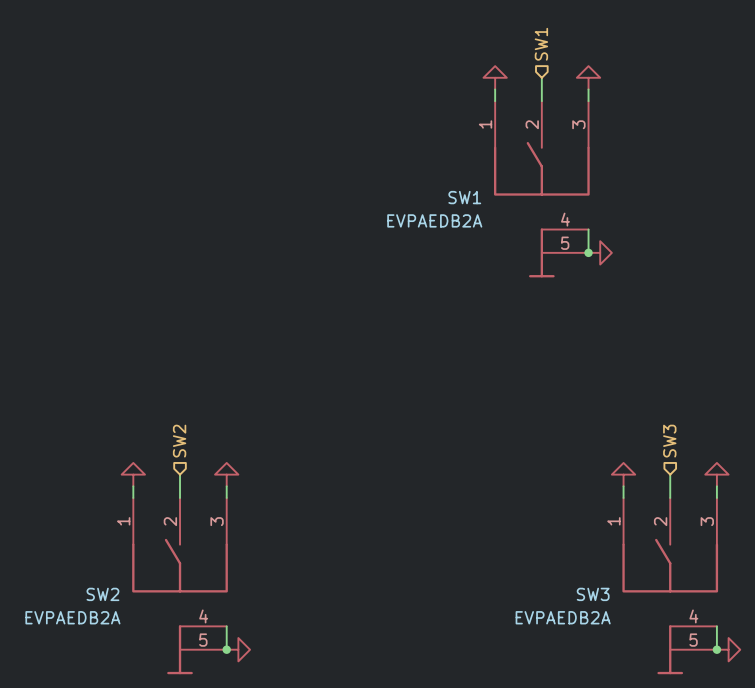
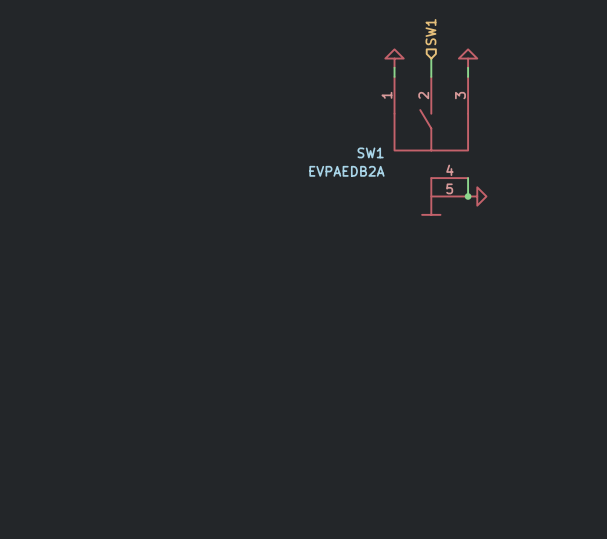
hierarchical label: SW2 (179, 441) -> none
hierarchical label: SW3 (669, 441) -> none
power symbol: (133, 474) -> none
wire: (180, 474) (180, 497) -> none
power symbol: (226, 474) -> none
power symbol: (623, 474) -> none
wire: (670, 474) (670, 497) -> none
power symbol: (716, 474) -> none
wire: (133, 486) (133, 497) -> none
wire: (226, 486) (226, 497) -> none
wire: (623, 486) (623, 497) -> none
wire: (716, 486) (716, 497) -> none
SW2: EVPAEDB2A (180, 586) -> none
SW3: EVPAEDB2A (670, 586) -> none
wire: (226, 626) (226, 649) -> none
wire: (716, 626) (716, 649) -> none
junction: (226, 649) -> none
power symbol: (238, 649) -> none
junction: (716, 649) -> none
power symbol: (728, 649) -> none

